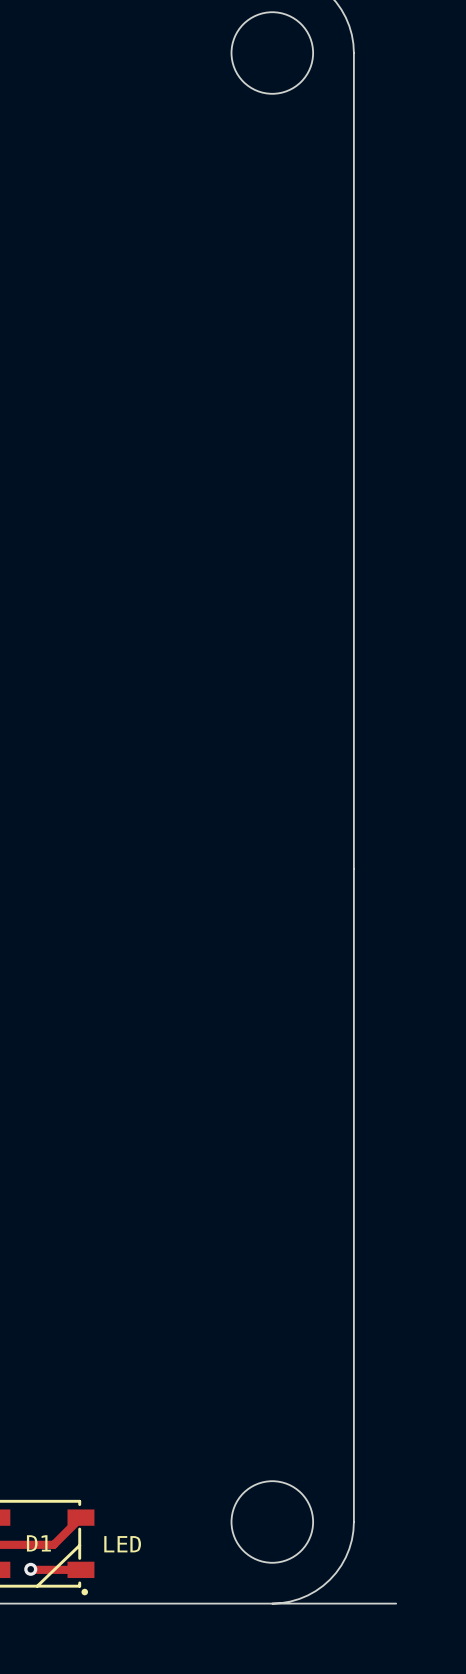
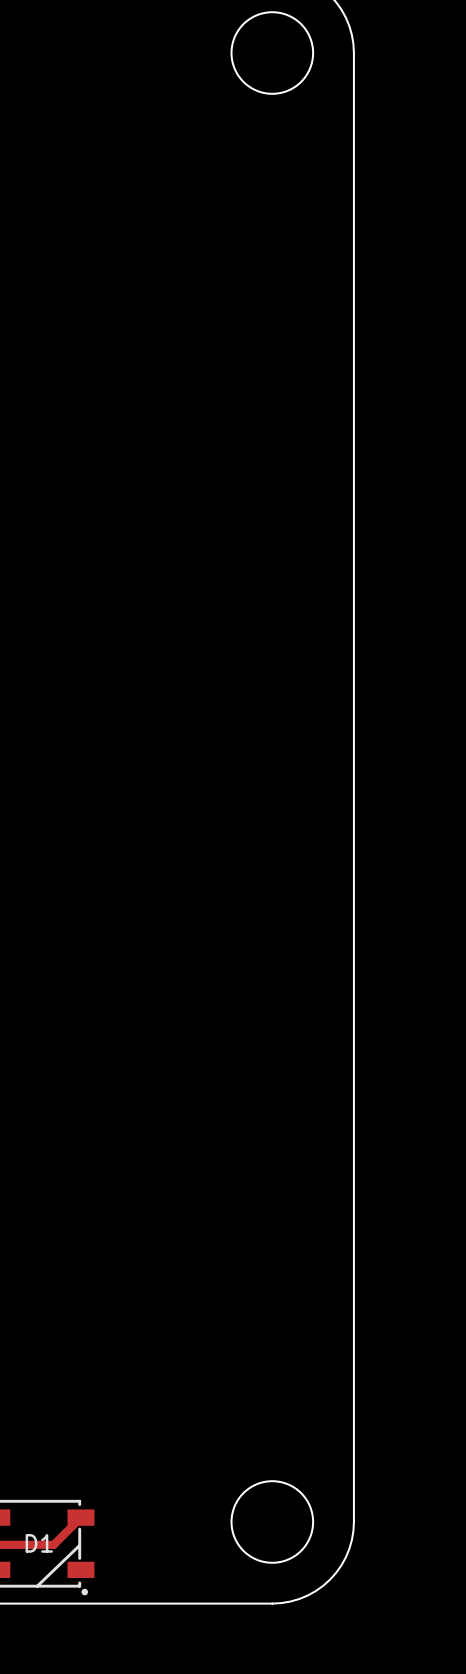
text: LED (122, 1544) -> none
track: (30, 1569) (80, 1569) -> none
via: (30, 1569) -> none
board edge: (272, 1603) (396, 1603) -> none

